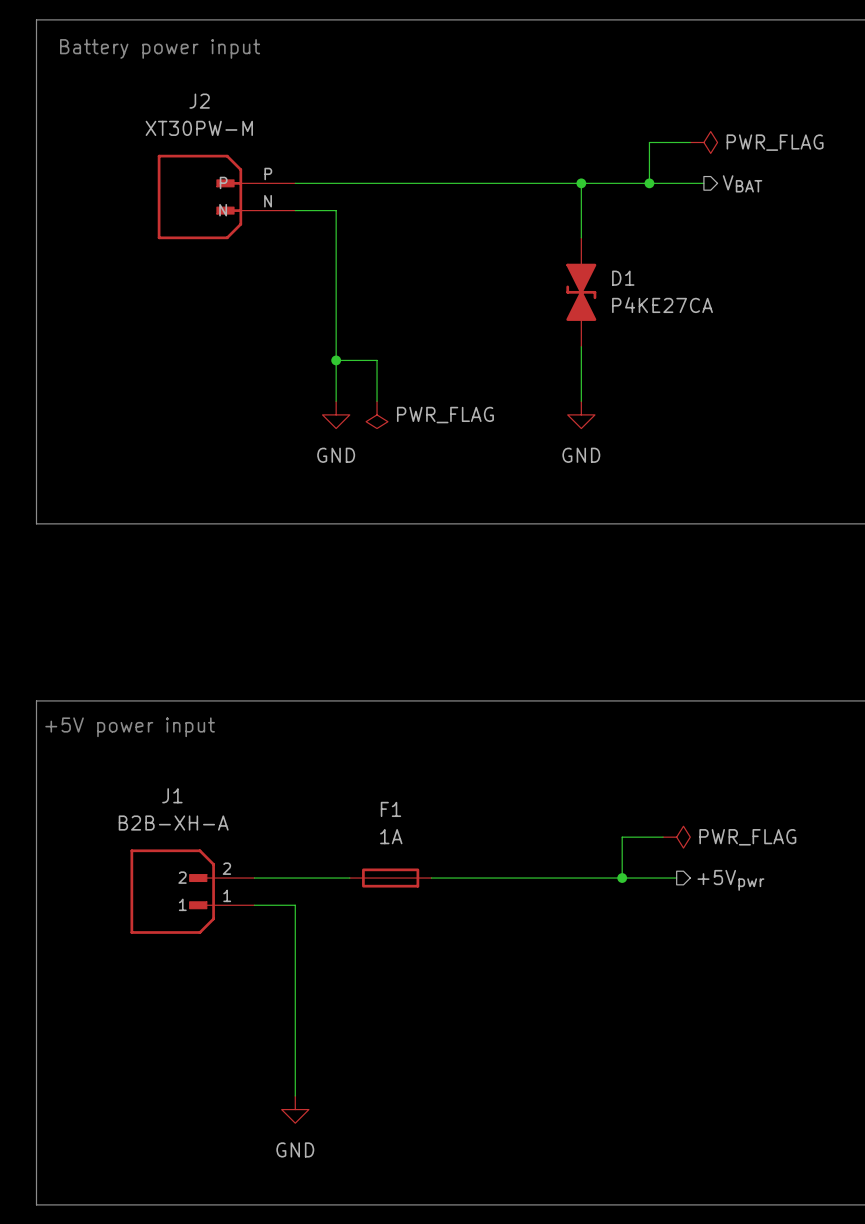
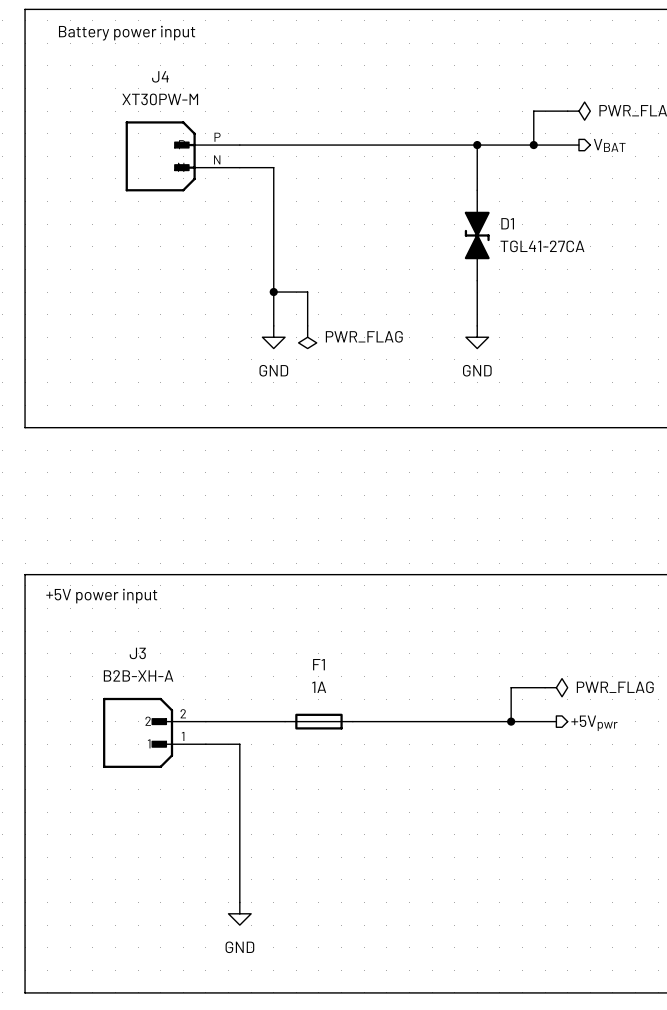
J2 name: J2 (199, 101) -> J4 (160, 76)
D1 value: P4KE27CA (662, 305) -> TGL41-27CA (542, 246)
J1 name: J1 (172, 795) -> J3 (137, 653)

